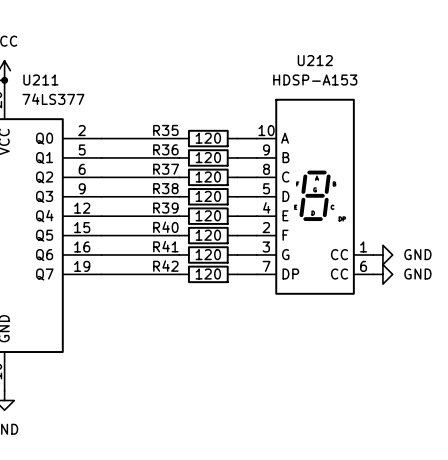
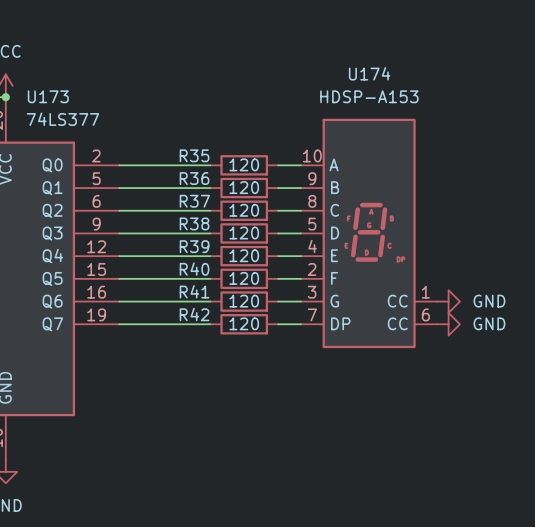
U212 name: U212 (315, 60) -> U174 (369, 73)
U211 name: U211 (40, 79) -> U173 (48, 96)

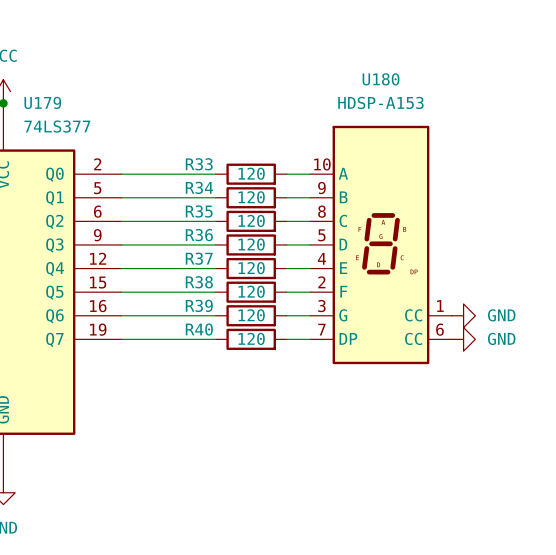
U174 name: U174 (369, 73) -> U180 (381, 79)
U173 name: U173 (48, 96) -> U179 (42, 102)
R35 name: R35 (194, 155) -> R33 (199, 164)
R36 name: R36 (194, 178) -> R34 (199, 187)
R37 name: R37 (194, 201) -> R35 (199, 211)
R38 name: R38 (194, 223) -> R36 (199, 235)
R39 name: R39 (194, 246) -> R37 (199, 258)
R40 name: R40 (194, 269) -> R38 (199, 282)
R41 name: R41 (194, 291) -> R39 (199, 305)
R42 name: R42 (194, 314) -> R40 (199, 329)

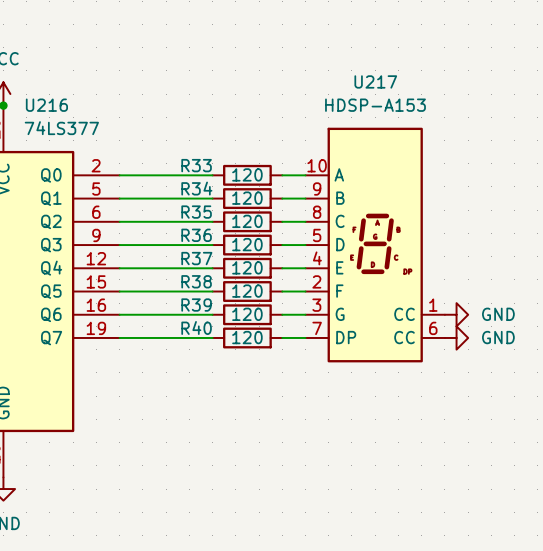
U180 name: U180 (381, 79) -> U217 (375, 81)
U179 name: U179 (42, 102) -> U216 (46, 105)

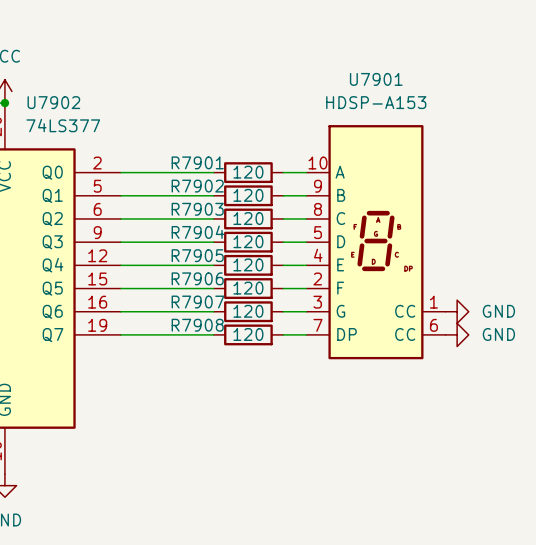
U217 name: U217 (375, 81) -> U7901 (376, 79)
U216 name: U216 (46, 105) -> U7902 (53, 102)
R33 name: R33 (196, 165) -> R7901 (197, 162)
R34 name: R34 (196, 188) -> R7902 (197, 186)
R35 name: R35 (196, 212) -> R7903 (197, 209)
R36 name: R36 (196, 235) -> R7904 (197, 232)
R37 name: R37 (196, 258) -> R7905 (197, 255)
R38 name: R38 (196, 281) -> R7906 (197, 278)
R39 name: R39 (196, 305) -> R7907 (197, 302)
R40 name: R40 (196, 327) -> R7908 (197, 325)

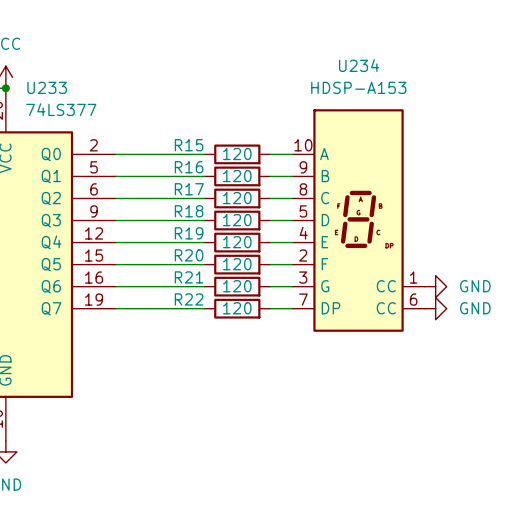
U7901 name: U7901 (376, 79) -> U234 (359, 65)
U7902 name: U7902 (53, 102) -> U233 (47, 87)
R7901 name: R7901 (197, 162) -> R15 (189, 145)
R7902 name: R7902 (197, 186) -> R16 (189, 167)
R7903 name: R7903 (197, 209) -> R17 (189, 189)
R7904 name: R7904 (197, 232) -> R18 (189, 211)
R7905 name: R7905 (197, 255) -> R19 (189, 233)
R7906 name: R7906 (197, 278) -> R20 (189, 255)
R7907 name: R7907 (197, 302) -> R21 (189, 277)
R7908 name: R7908 (197, 325) -> R22 (189, 299)

